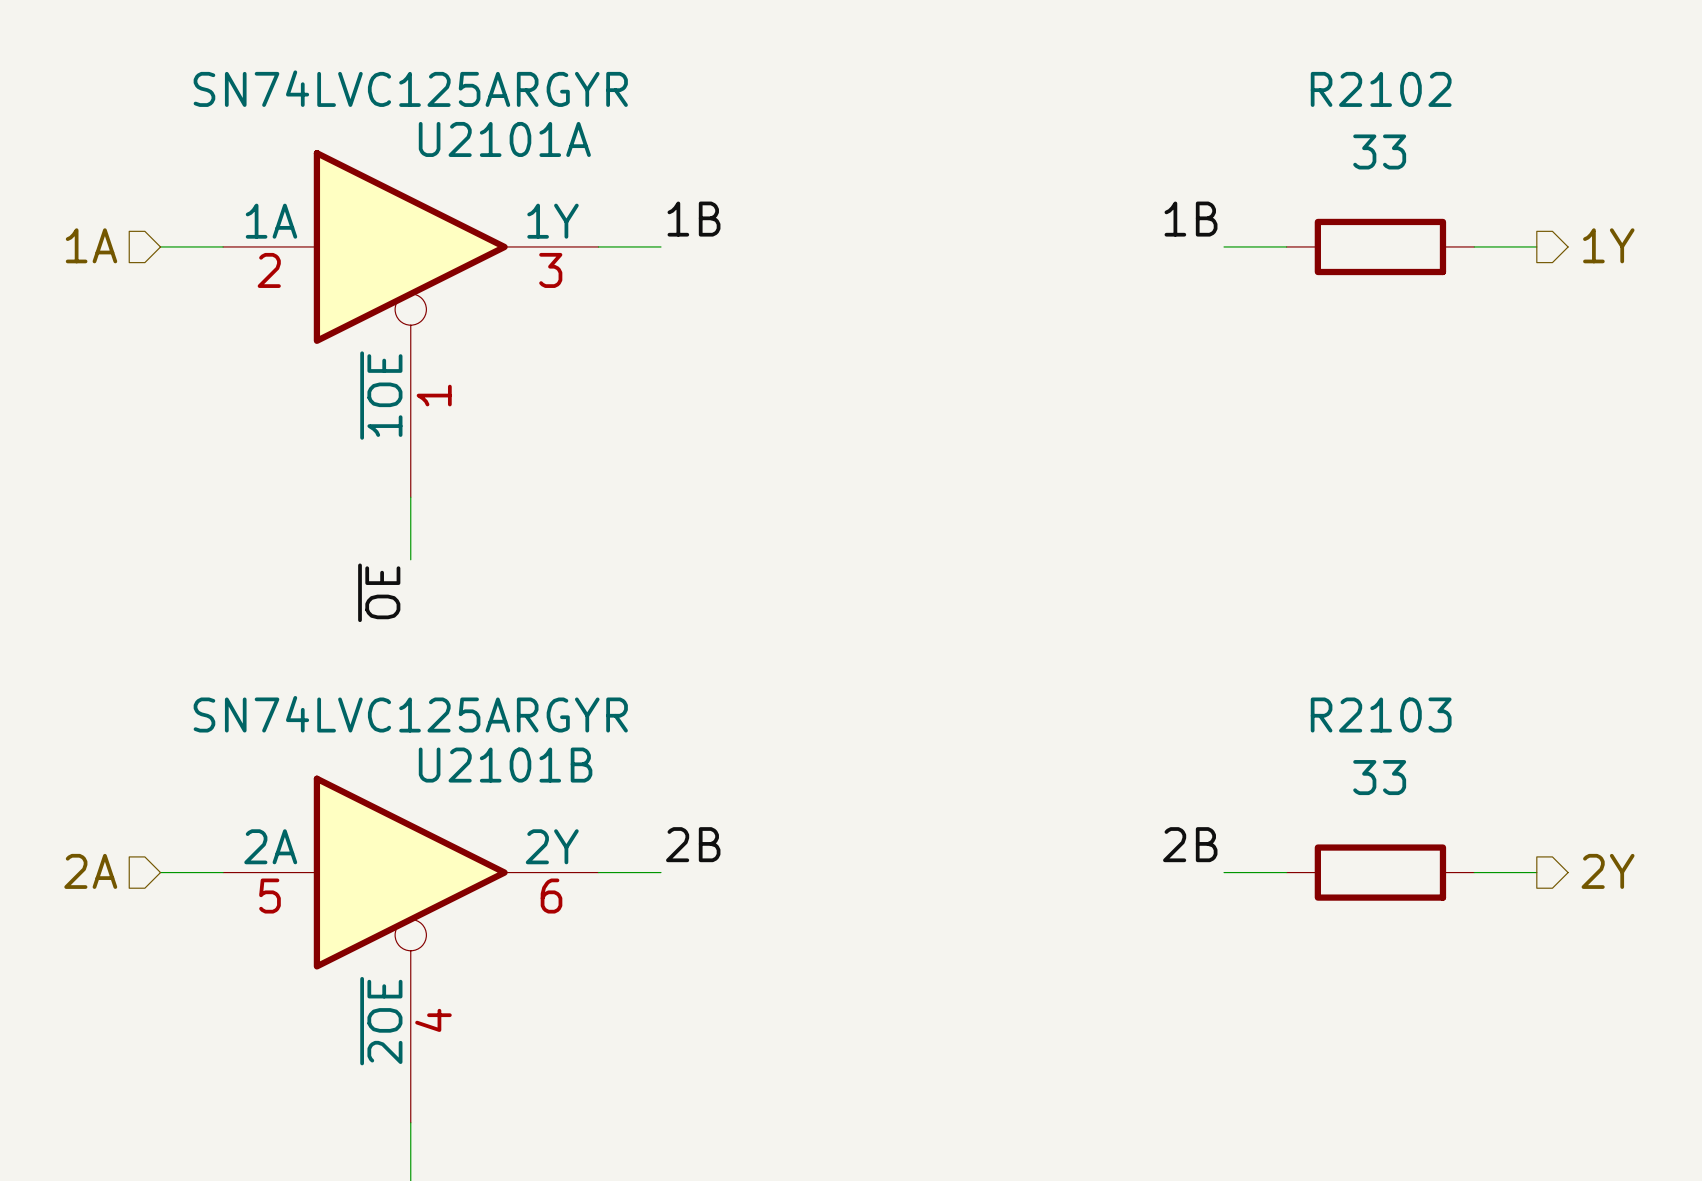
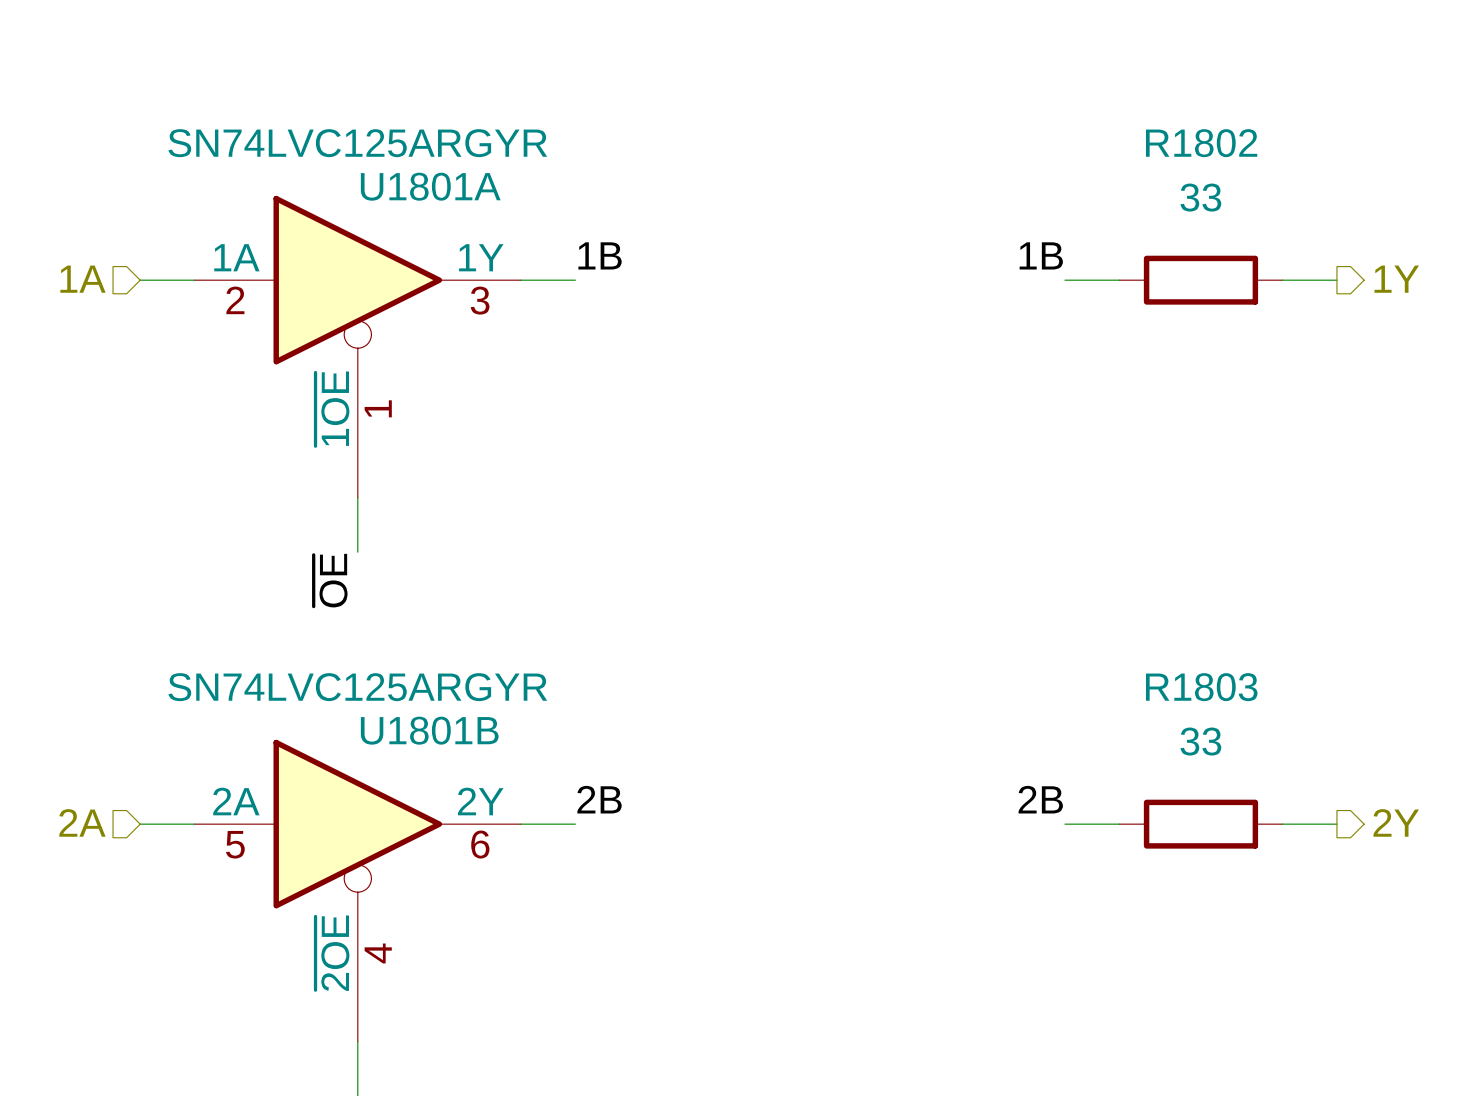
R2102 name: R2102 (1381, 89) -> R1802 (1201, 143)
U2101A name: U2101A (504, 139) -> U1801A (430, 186)
R2103 name: R2103 (1381, 715) -> R1803 (1201, 687)
U2101B name: U2101B (505, 765) -> U1801B (429, 730)

